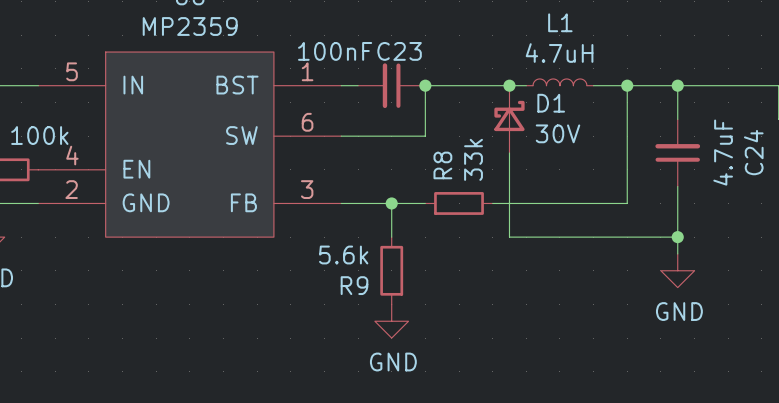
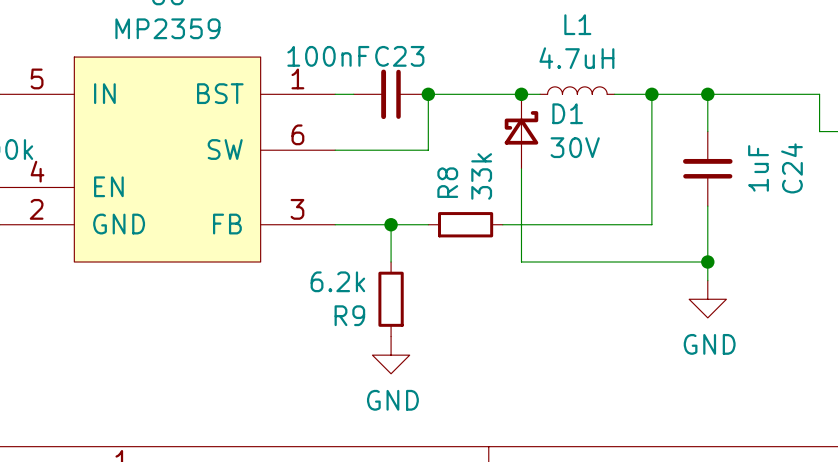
C24 value: 4.7uF (723, 152) -> 1uF (758, 168)
R9 value: 5.6k (343, 254) -> 6.2k (337, 281)

